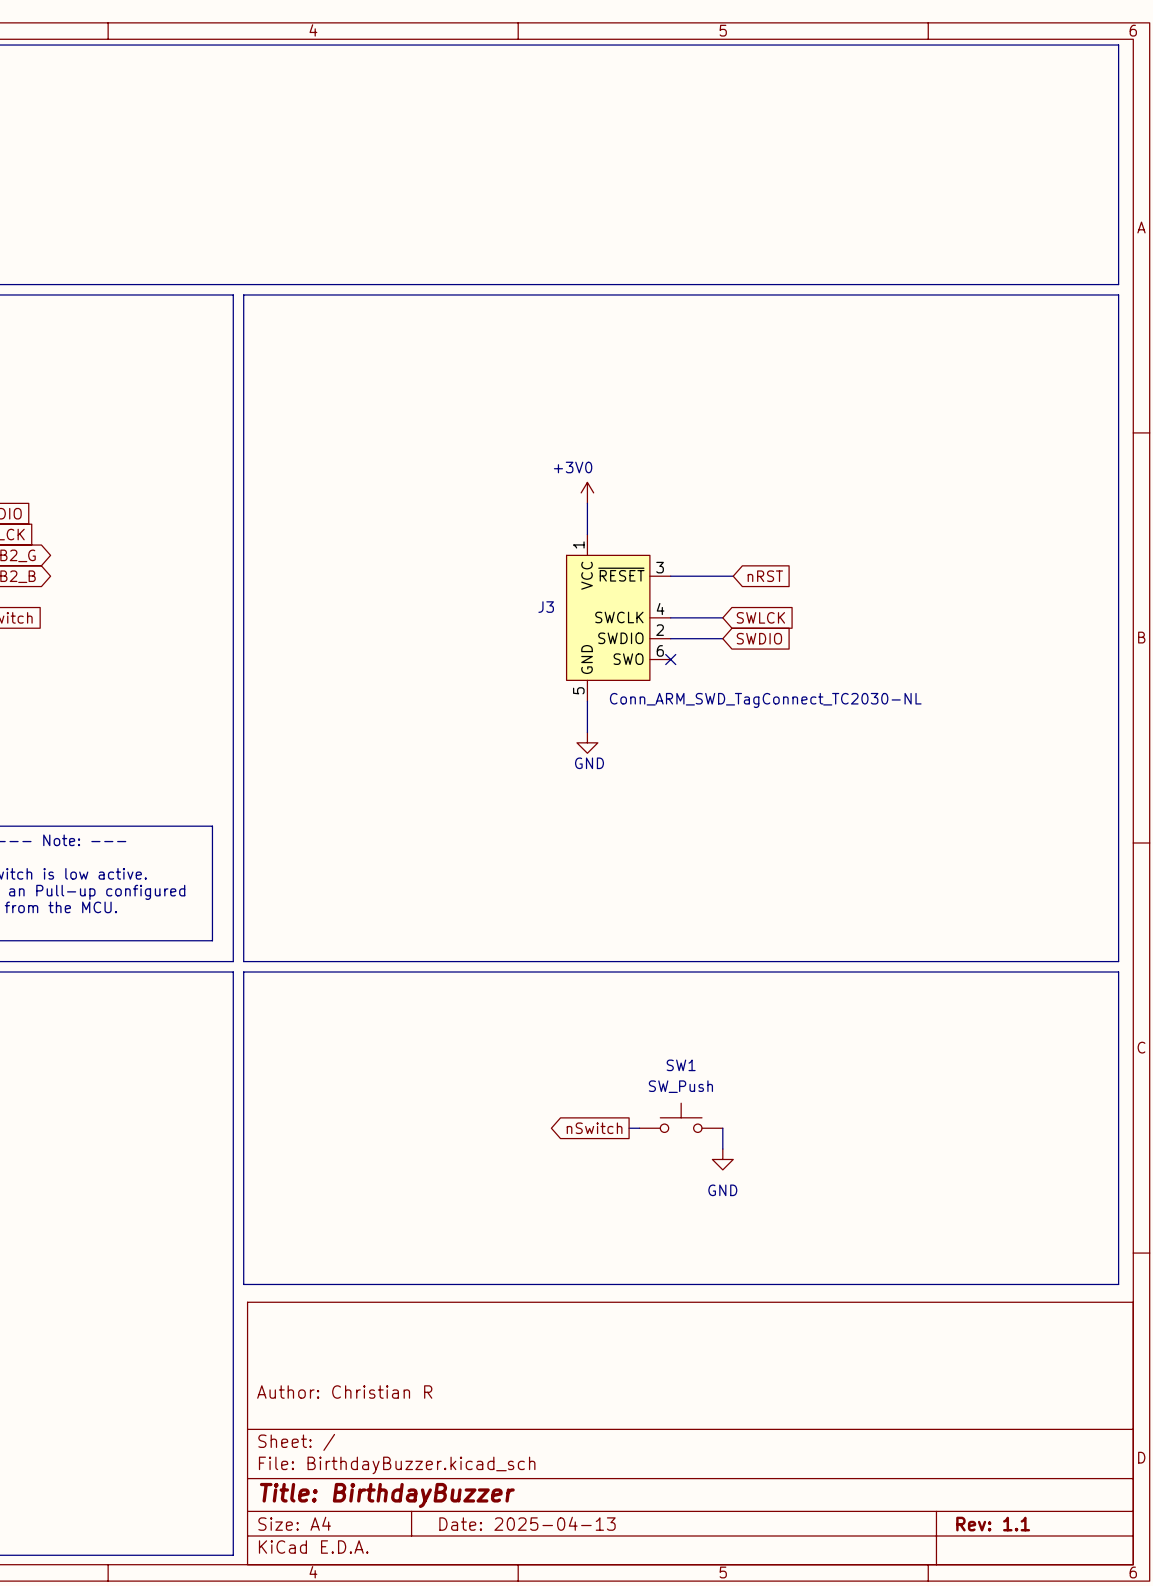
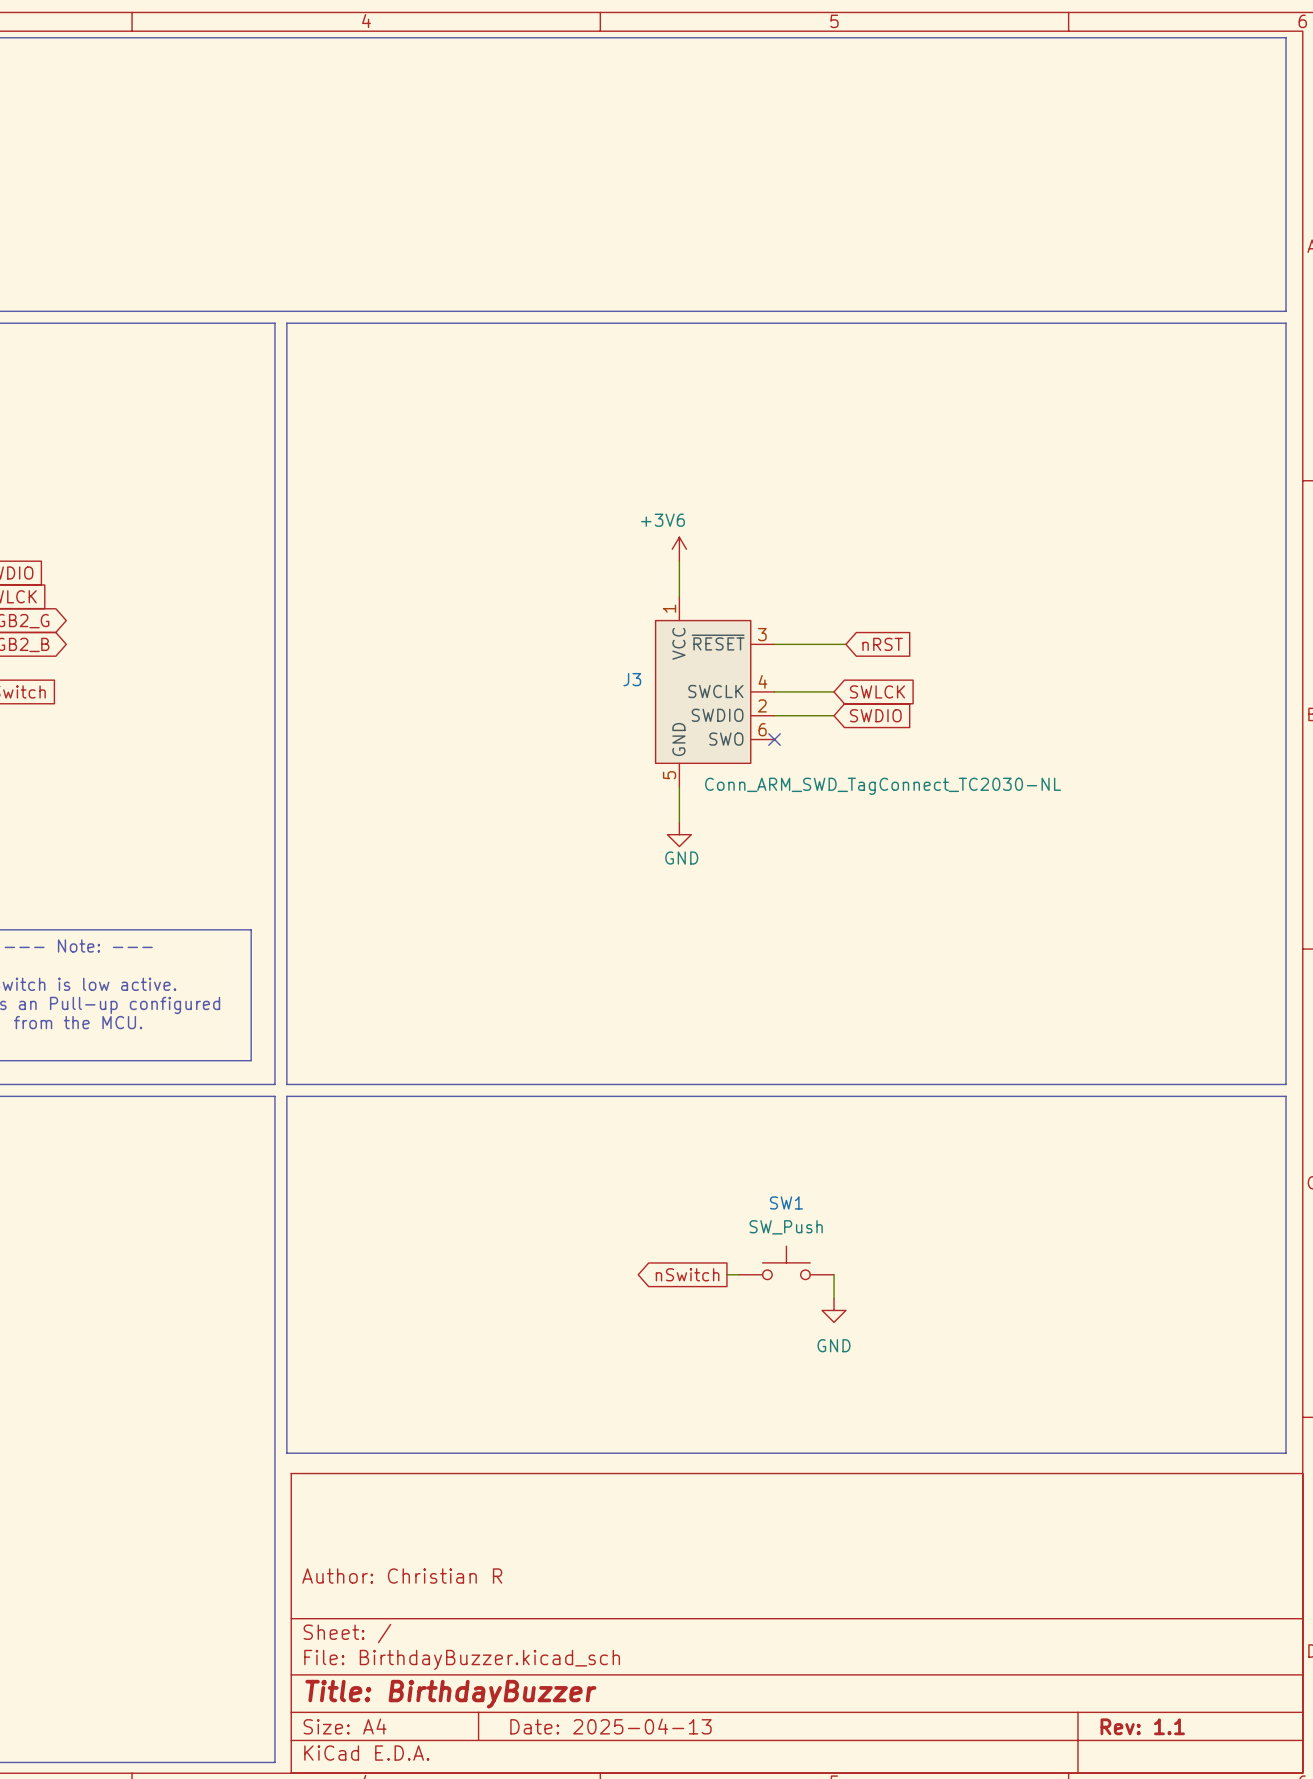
power symbol: +3V0 (587, 492) -> +3V6 (679, 549)

